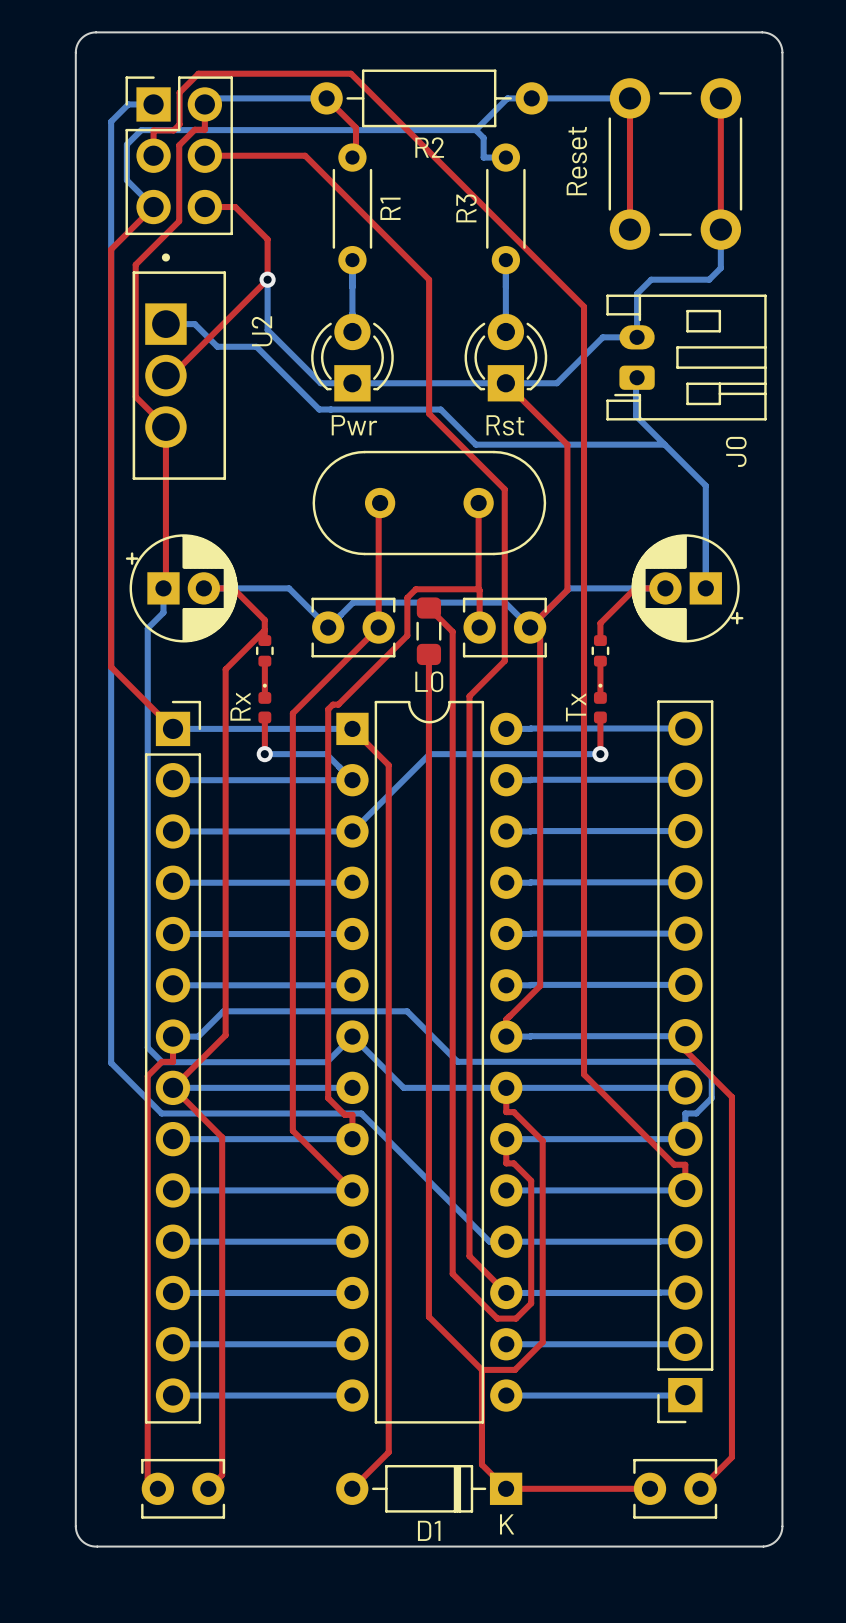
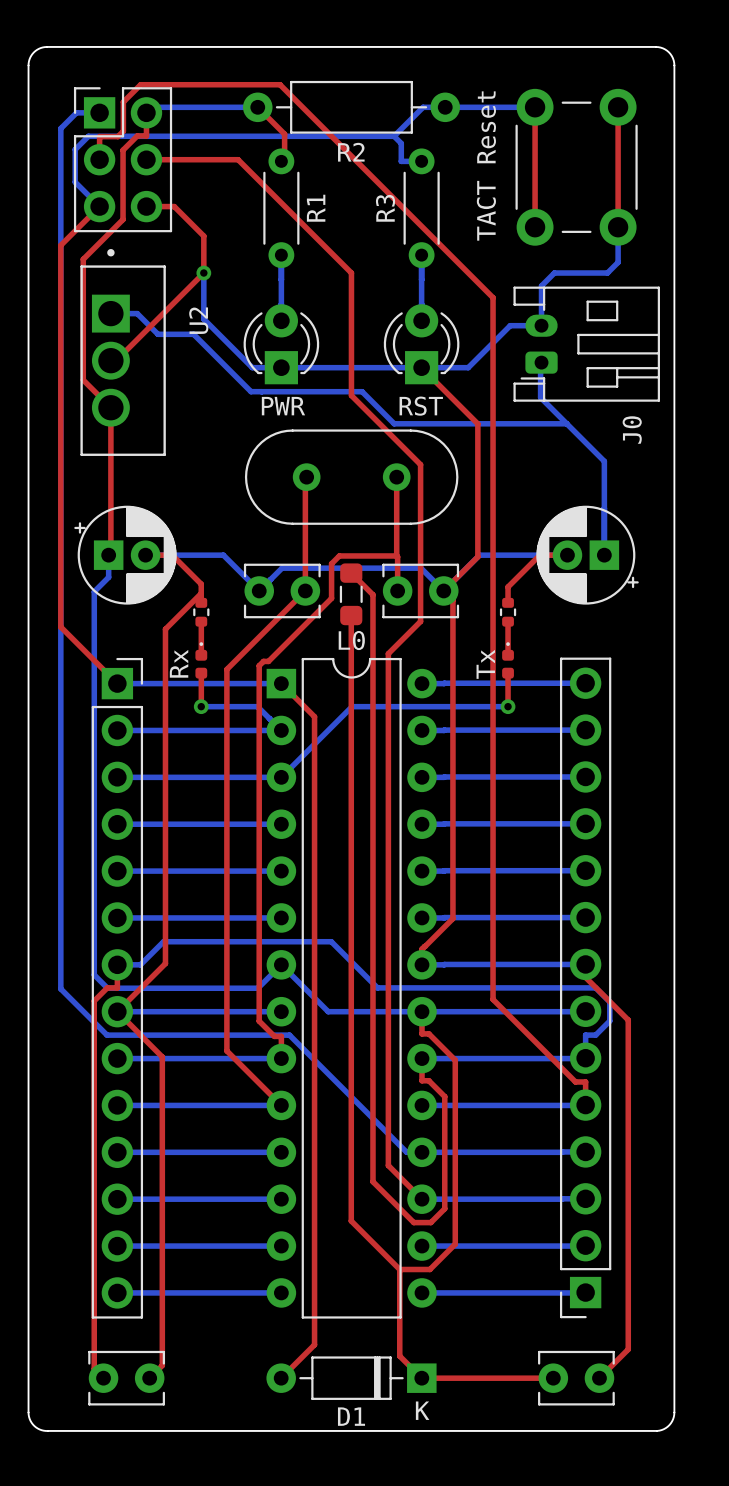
part value: Reset (576, 161) -> TACT Reset (486, 166)
part value: Pwr (354, 425) -> PWR (283, 406)
part value: Rst (505, 425) -> RST (421, 406)

